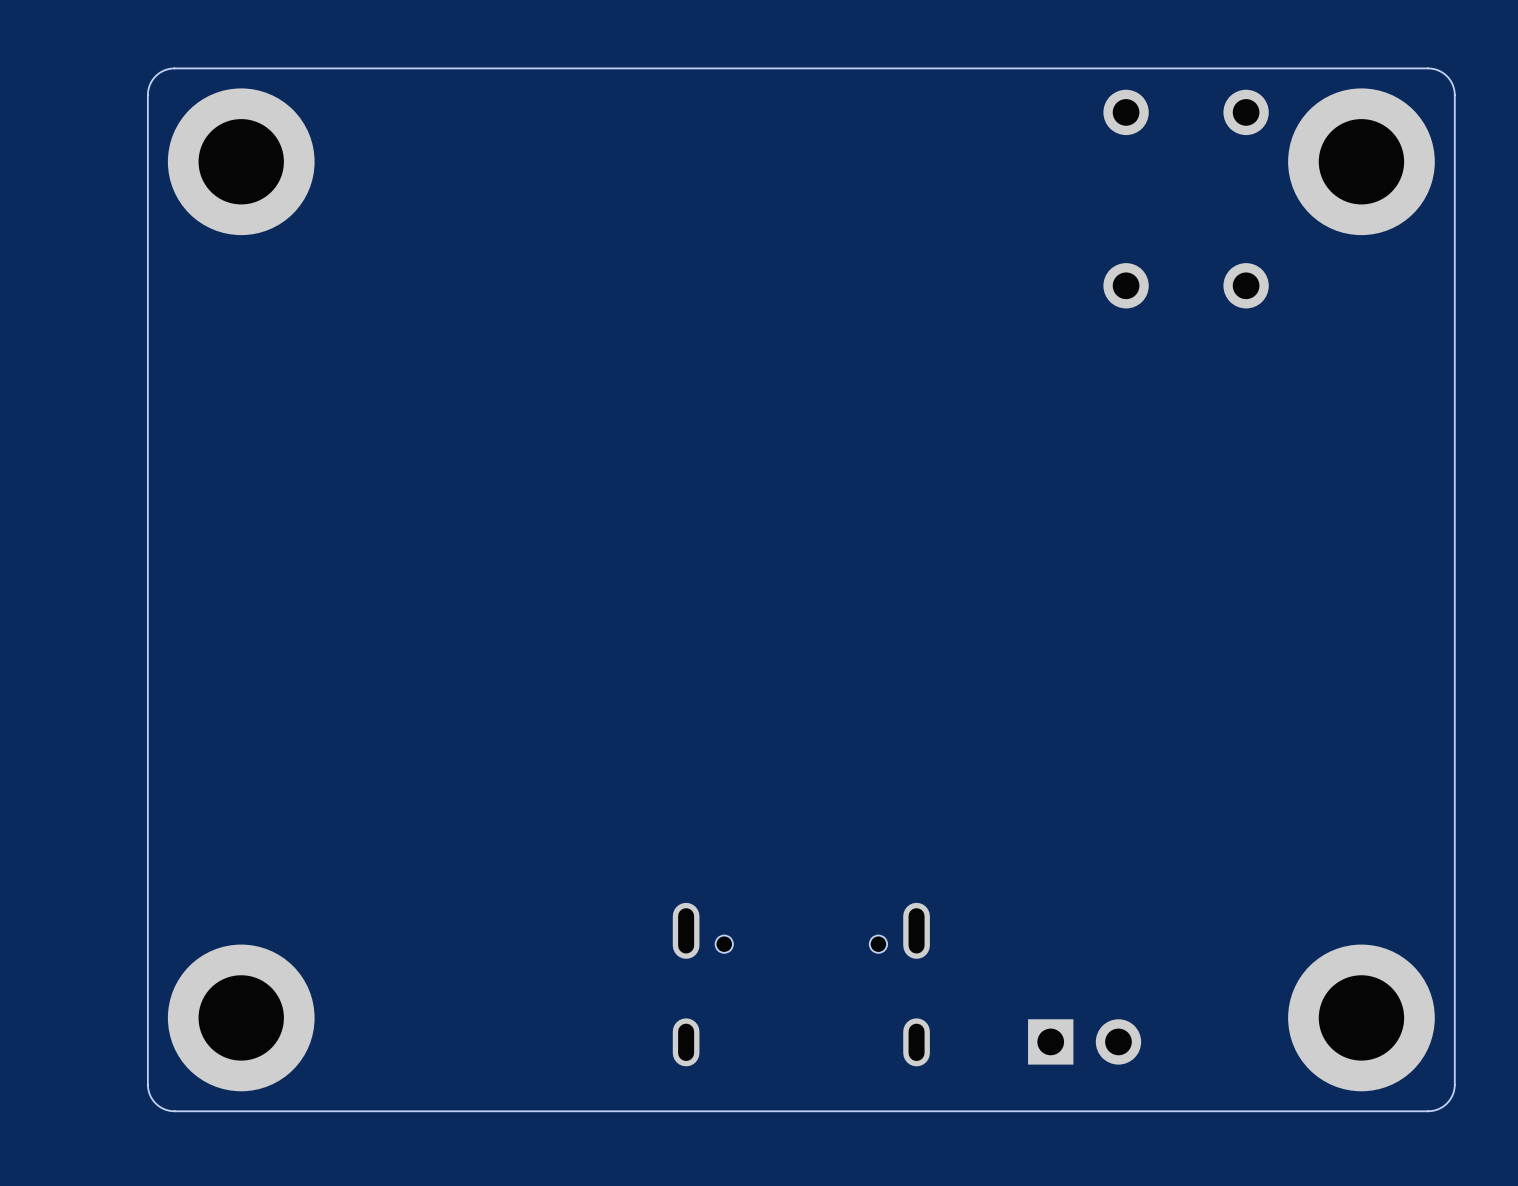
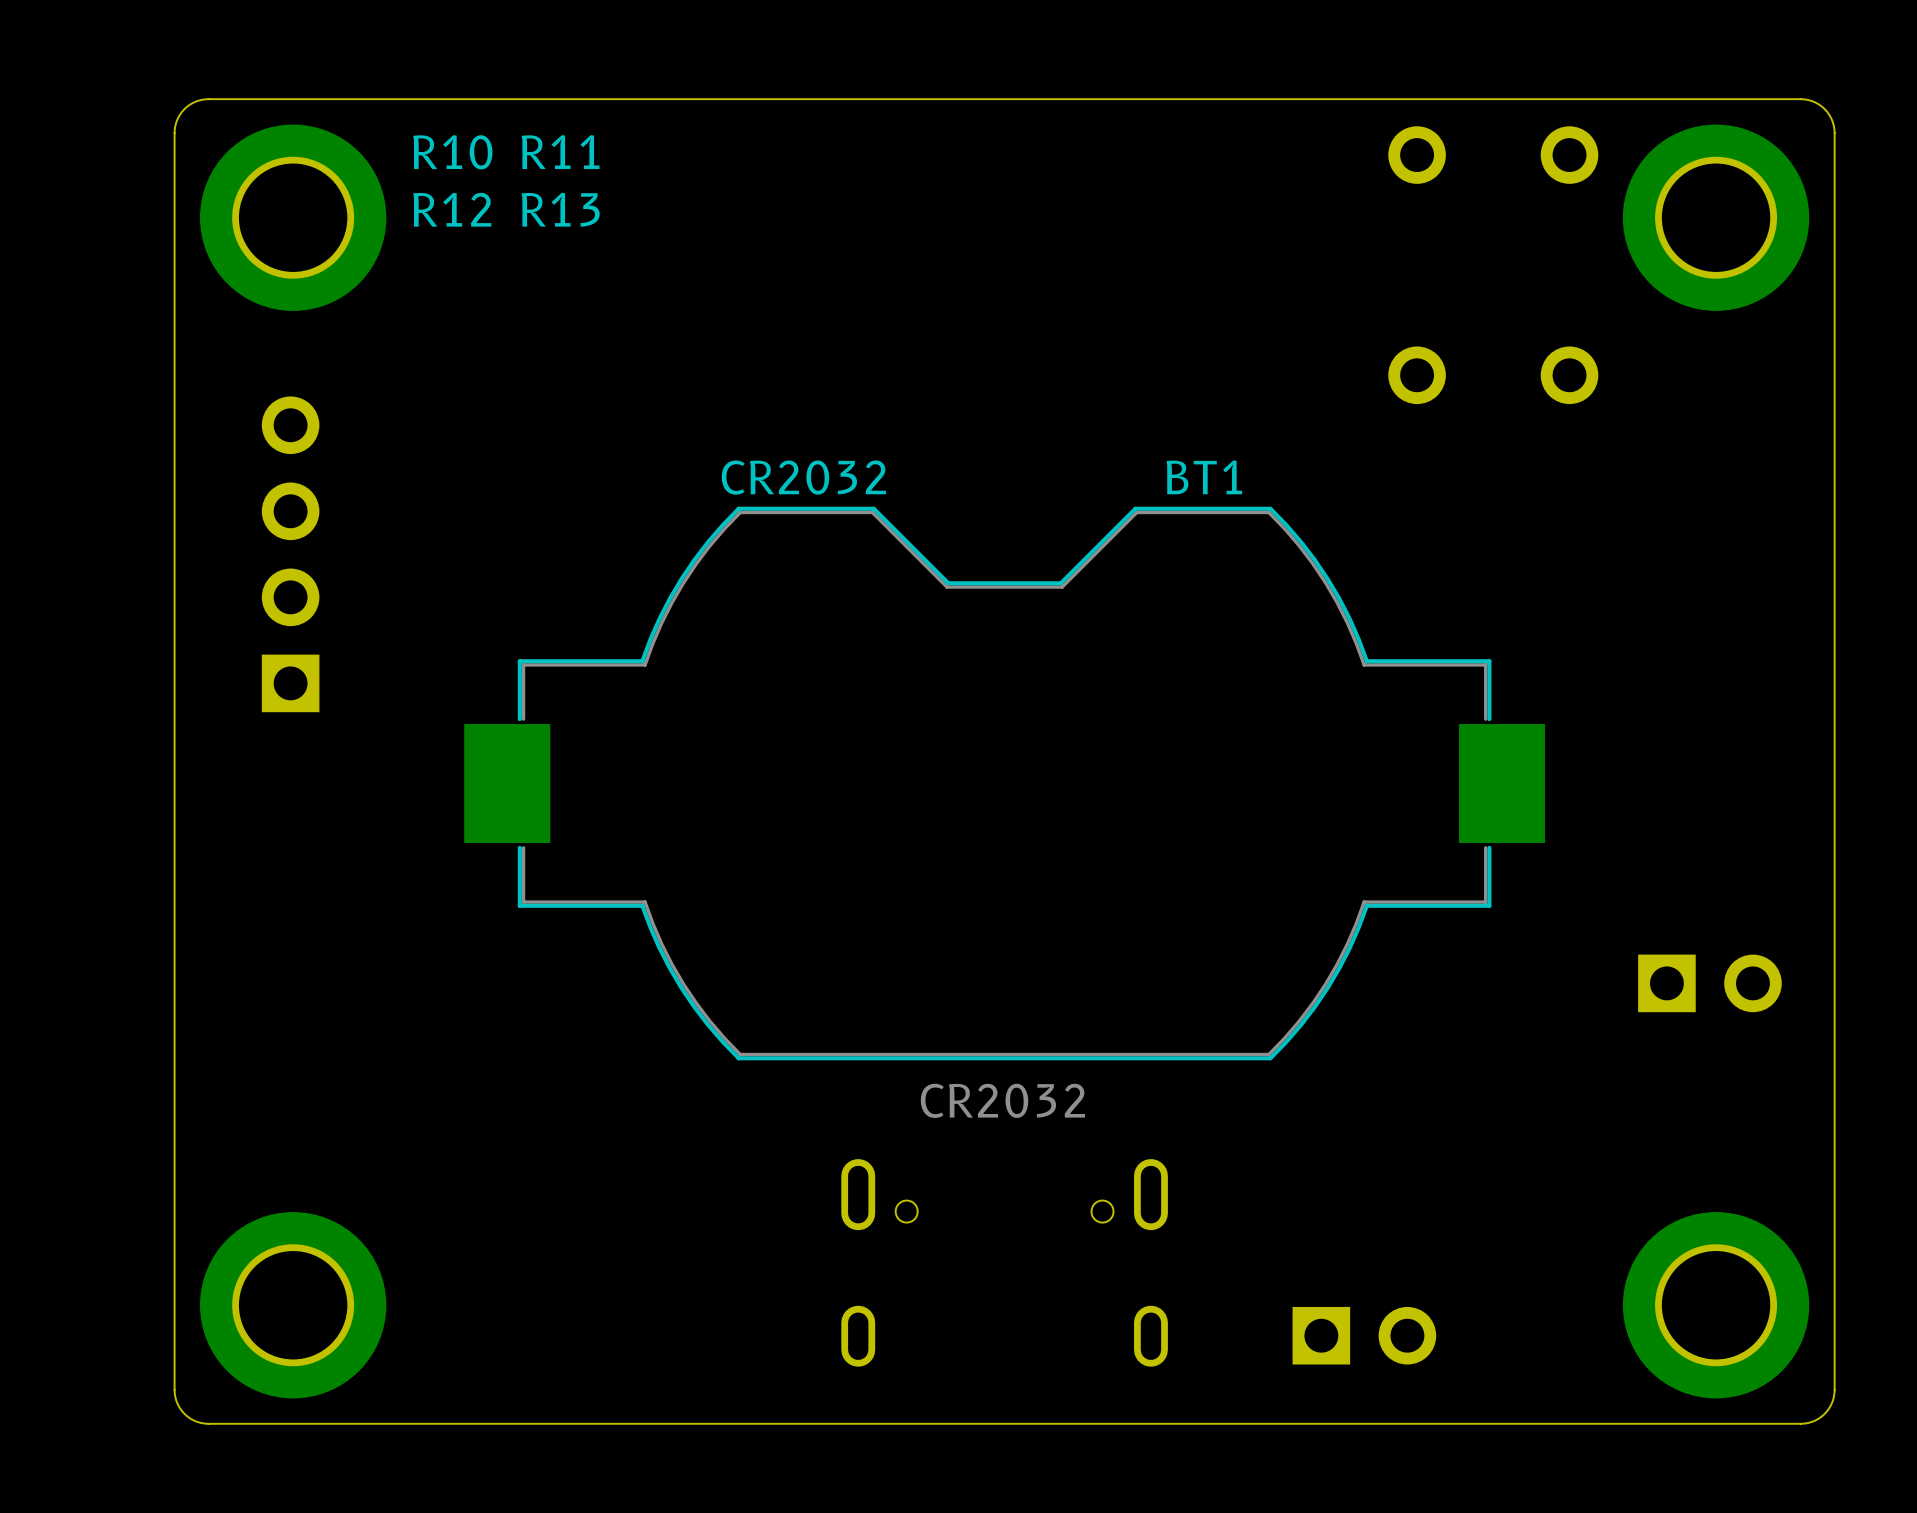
R10: none -> (452, 152)
R11: none -> (560, 152)
R12: none -> (452, 209)
R13: none -> (560, 209)
text: none -> CR2032 (803, 477)
part: none -> (290, 554)
BT1: none -> CR2032 (1004, 783)
part: none -> (1709, 983)

